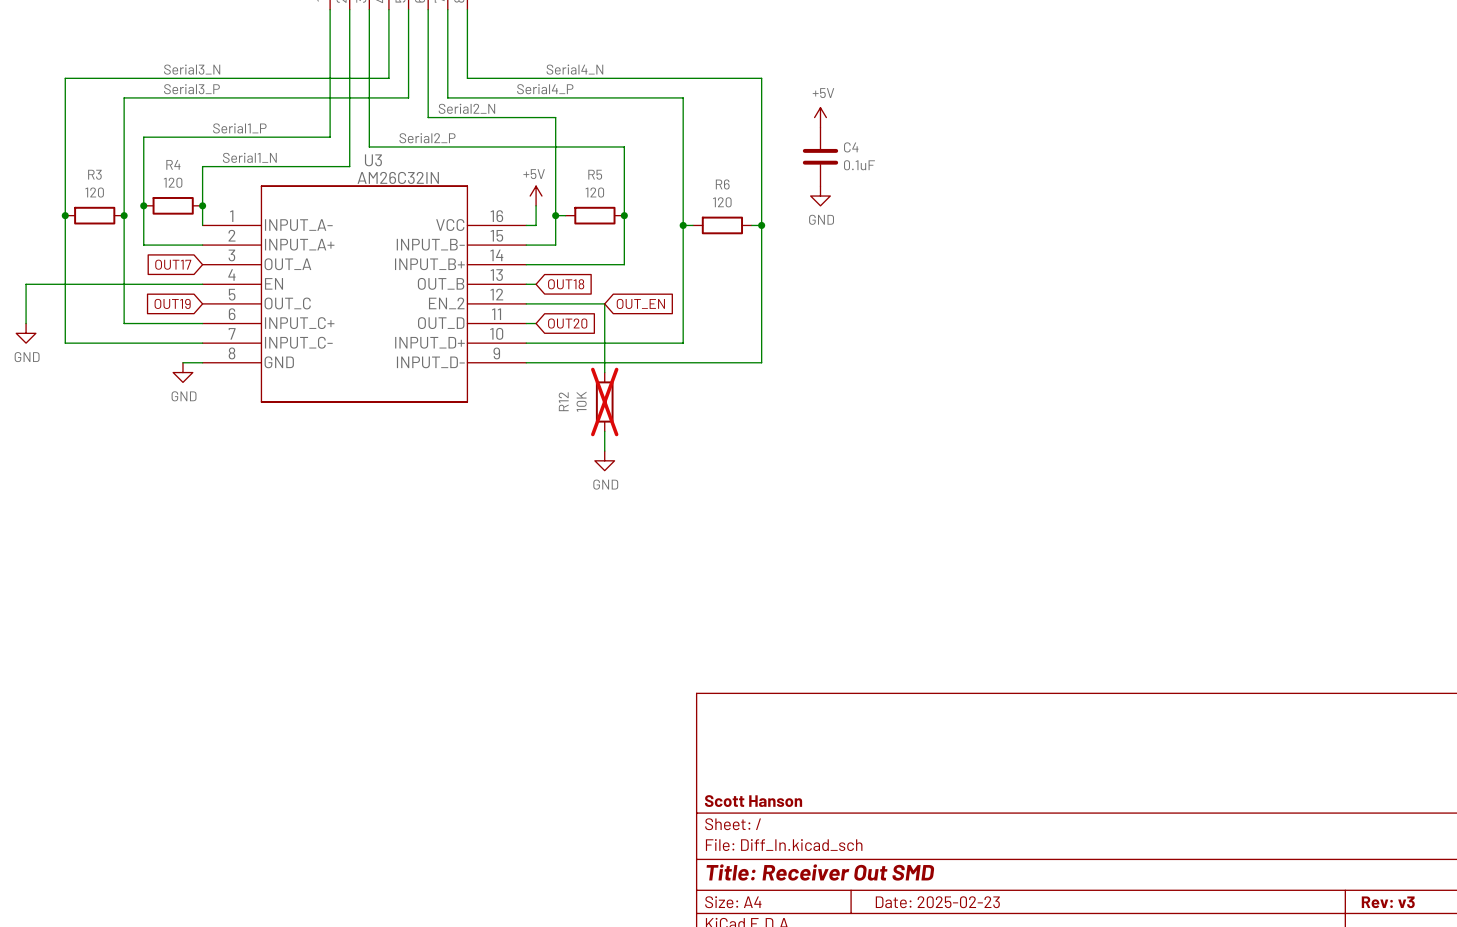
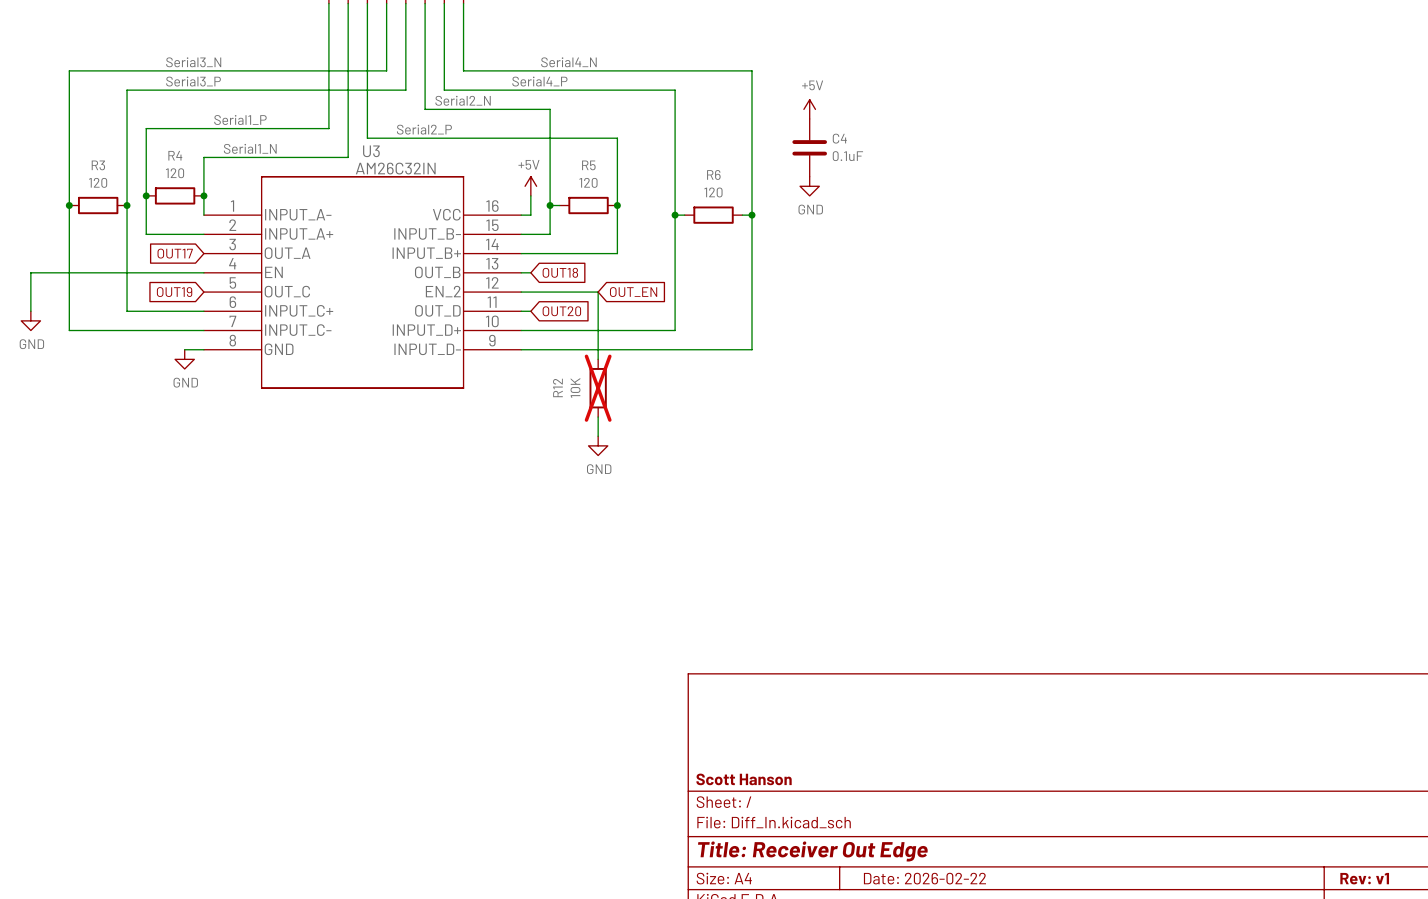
title block: Title: Receiver Out SMD (820, 872) -> Title: Receiver Out Edge (812, 851)
title block: Date: 2025-02-23 (937, 902) -> Date: 2026-02-22 (924, 878)
title block: Rev: v3 (1388, 902) -> Rev: v1 (1364, 878)

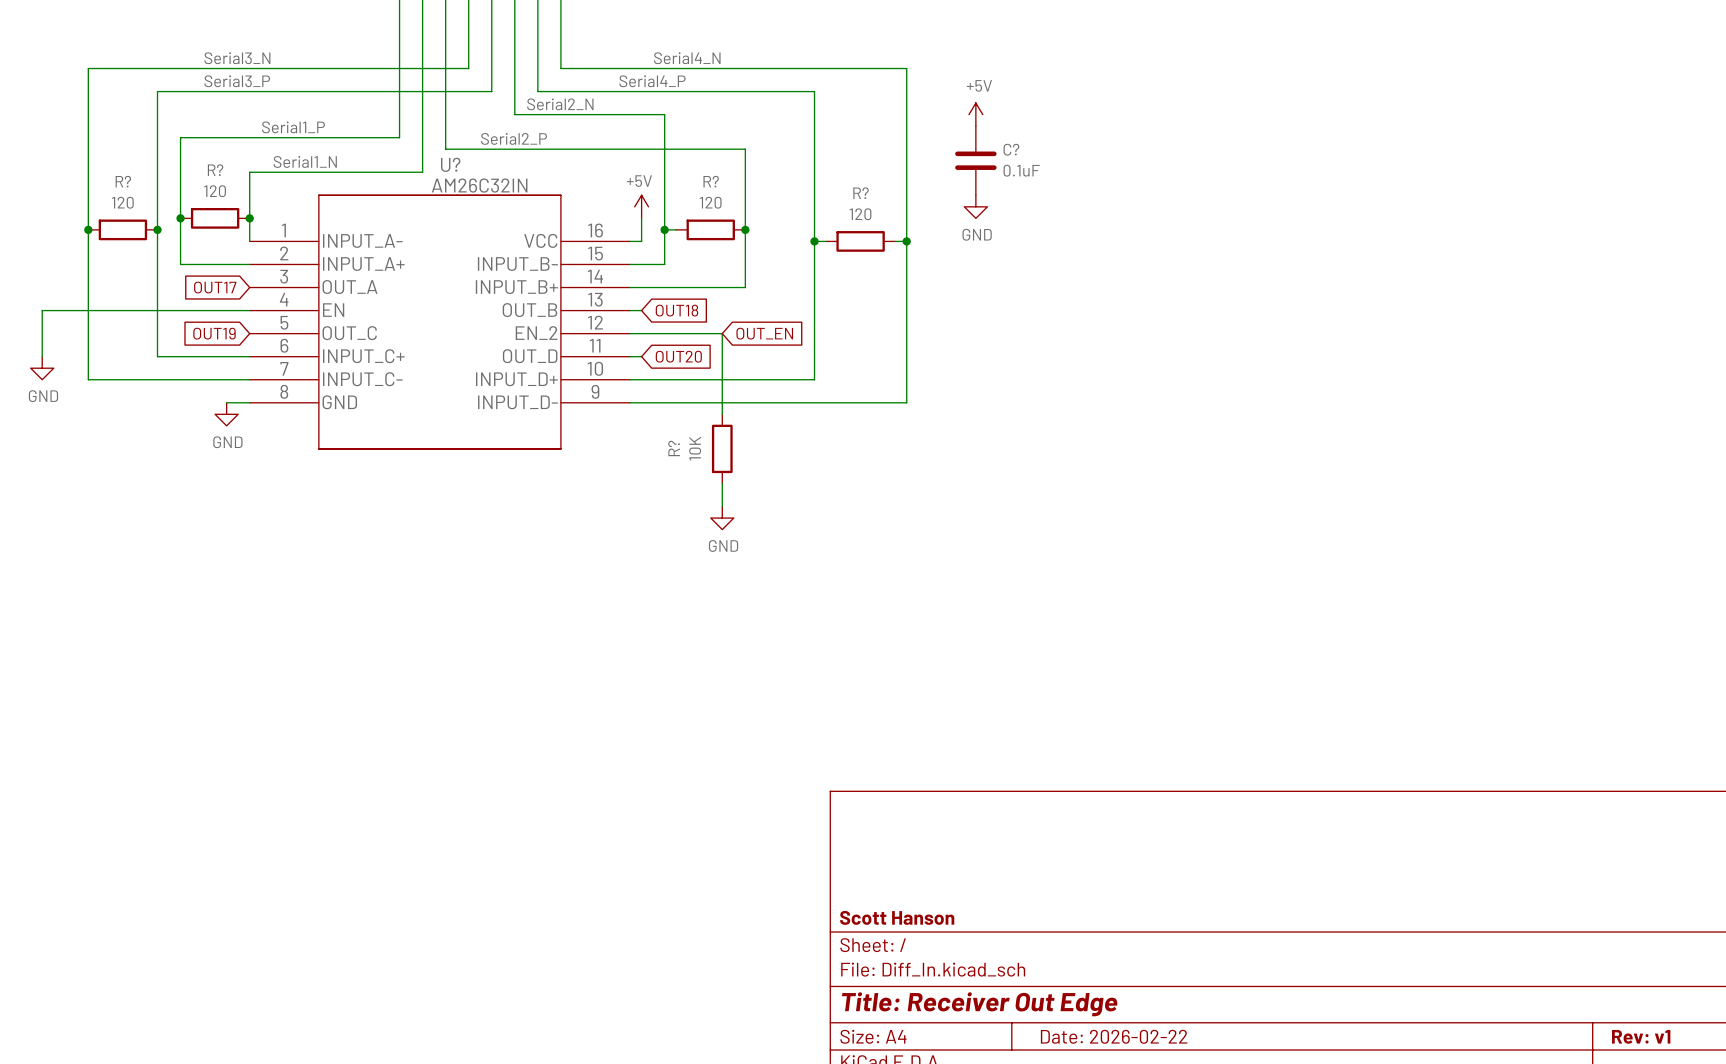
C4 name: C4 (839, 138) -> C? (1011, 149)
U3 name: U3 (371, 151) -> U? (450, 164)
R4 name: R4 (175, 155) -> R? (215, 170)
R3 name: R3 (98, 165) -> R? (123, 181)
R5 name: R5 (588, 165) -> R? (711, 181)
R6 name: R6 (713, 174) -> R? (861, 193)
R12 name: R12 (557, 387) -> R? (674, 448)
R12 do-not-place cross: (598, 388) -> none

